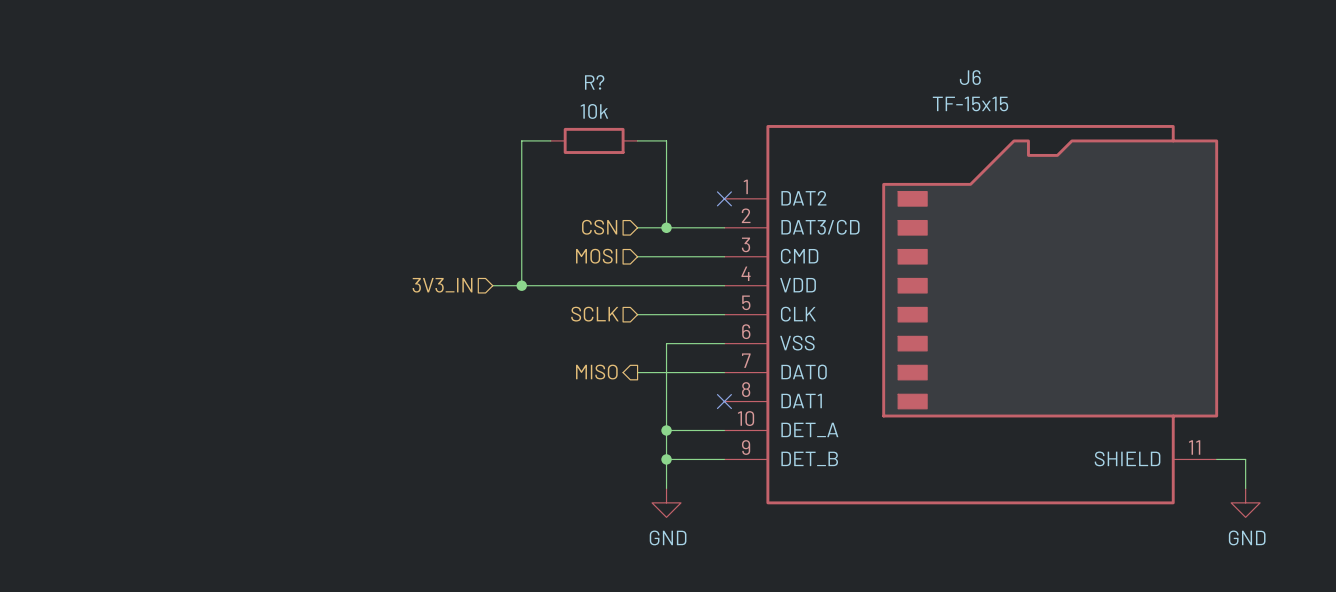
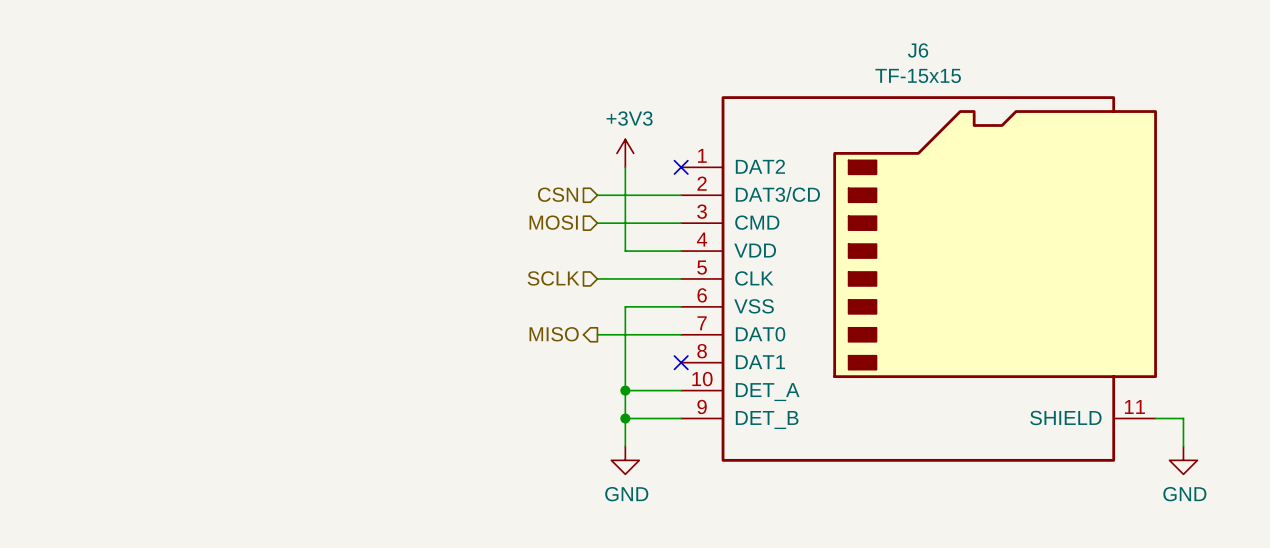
wire: (550, 140) (521, 140) (521, 285) -> none
R?: 10k (594, 140) -> none
wire: (637, 140) (666, 140) (666, 198) -> none
power symbol: none -> +3V3 (625, 153)
junction: (666, 227) -> none
hierarchical label: 3V3_IN (442, 285) -> none
wire: (492, 285) (666, 285) -> (625, 195) (625, 251)
junction: (521, 285) -> none

